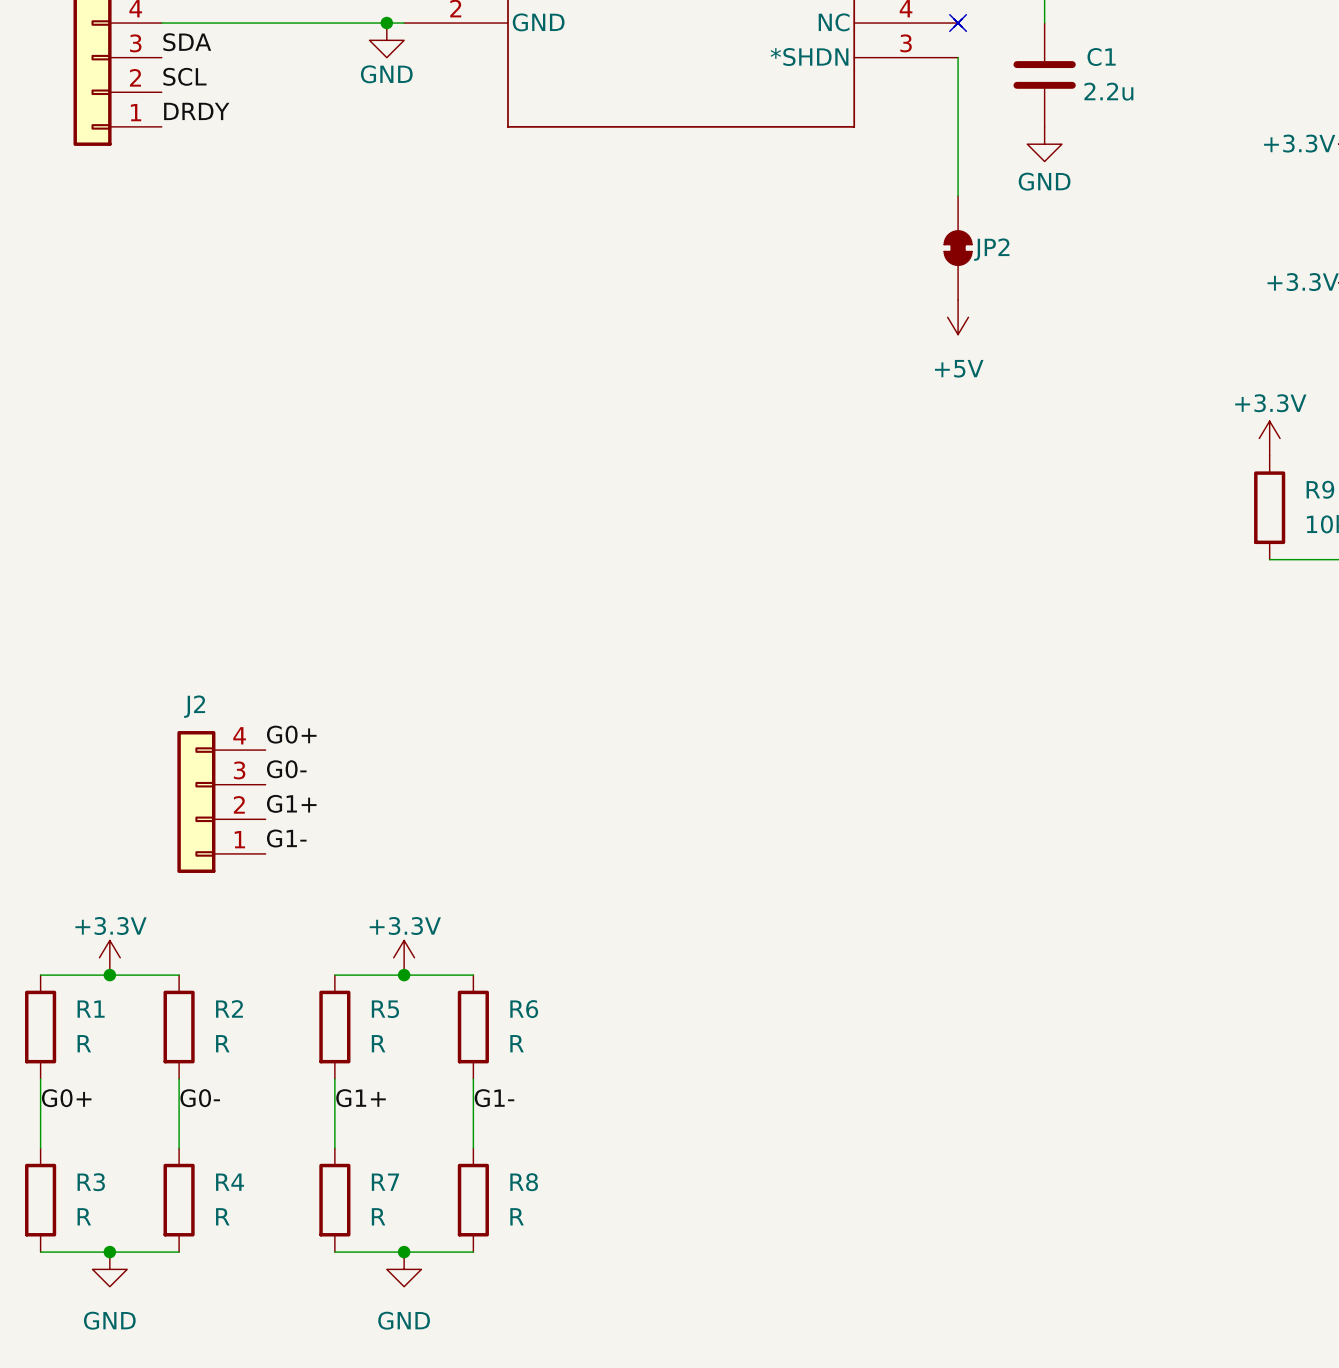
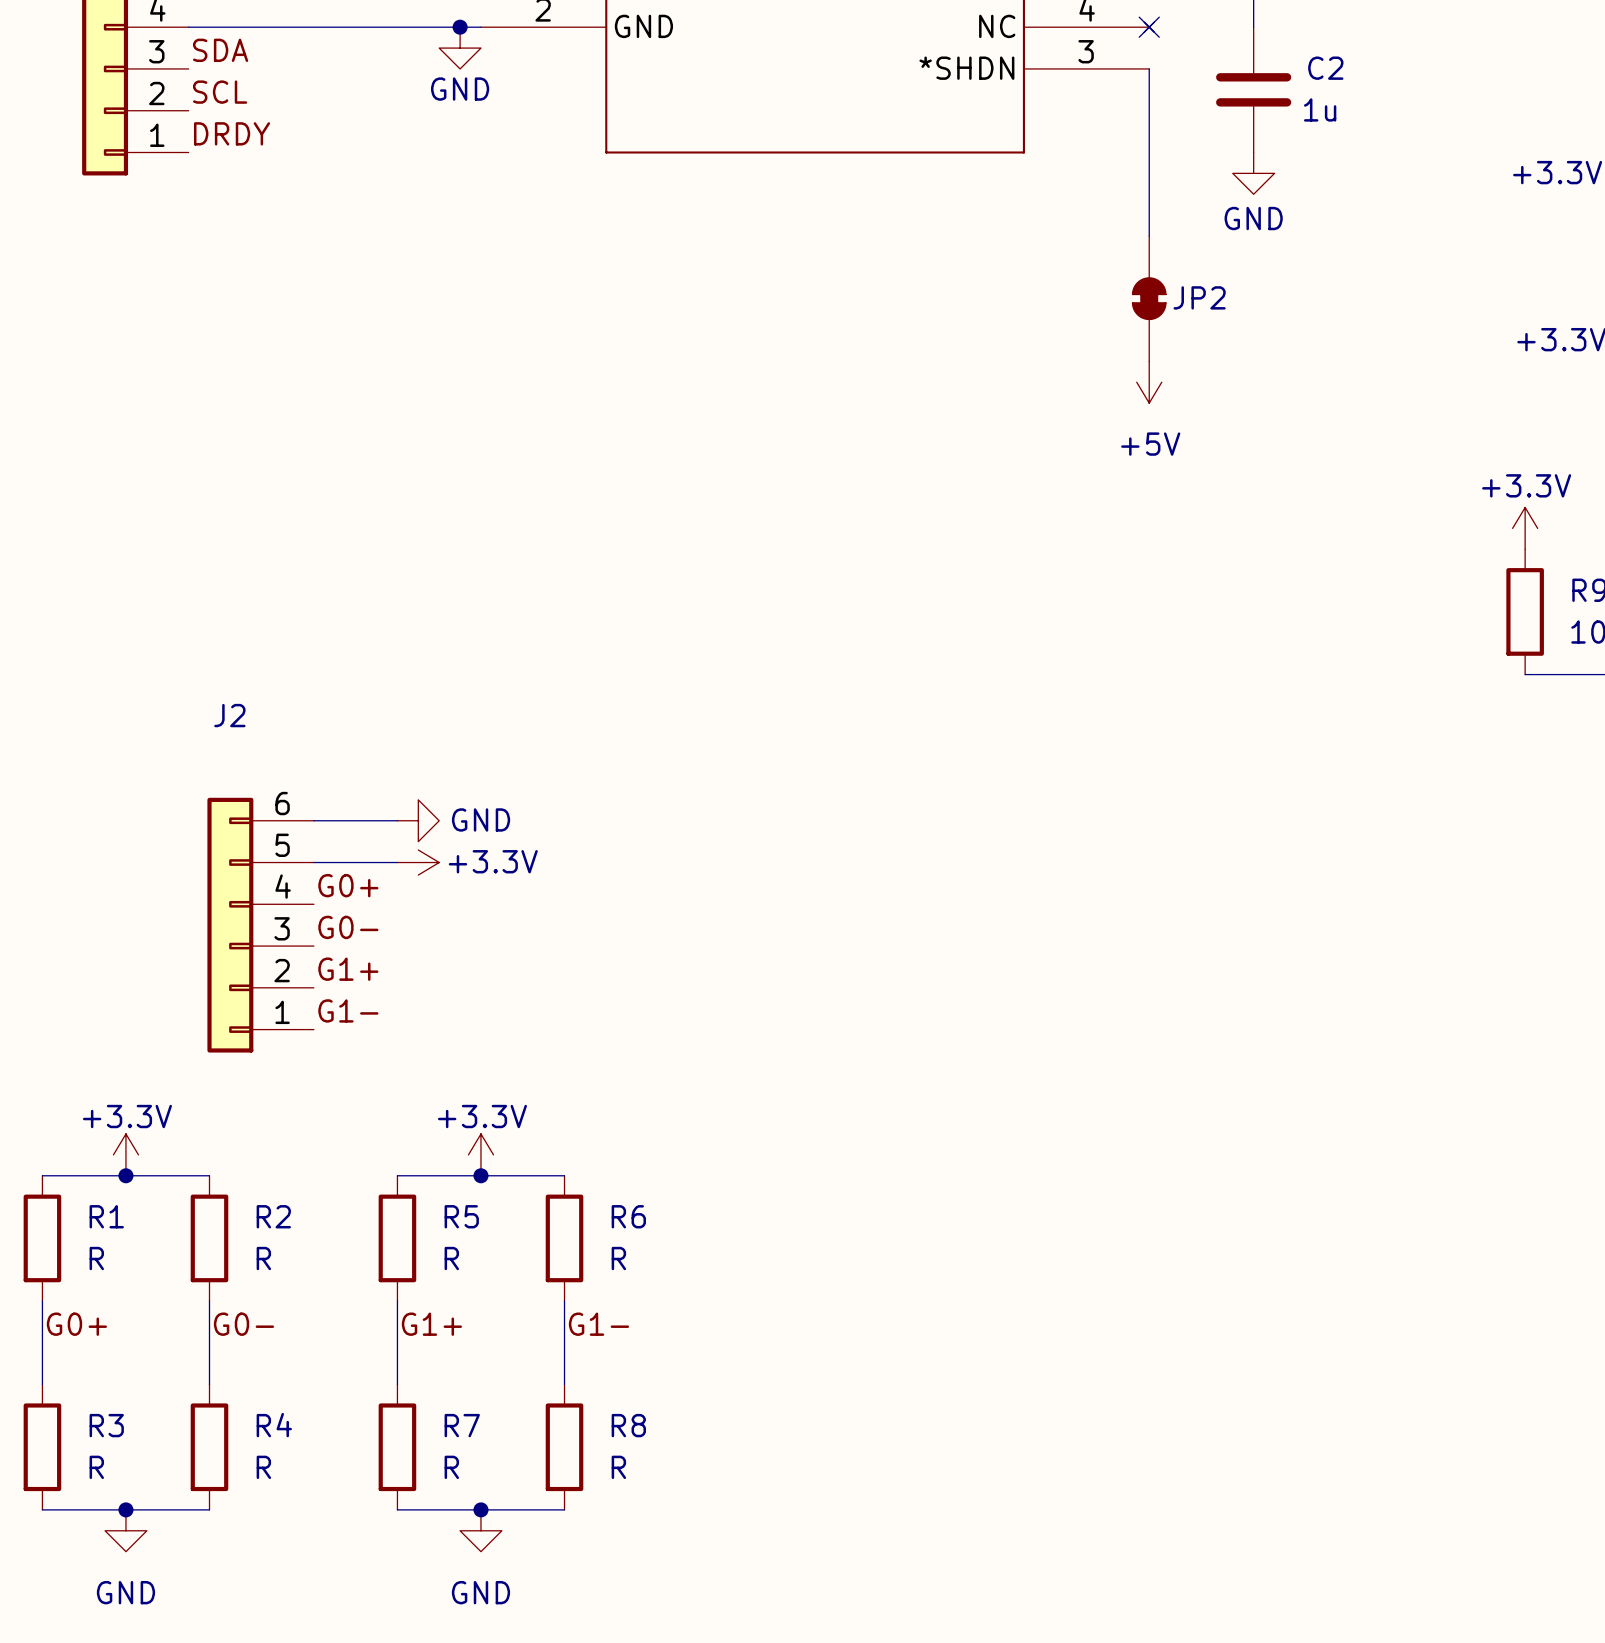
C1 name: C1 (1101, 57) -> C2 (1325, 68)
C1 value: 2.2u (1108, 91) -> 1u (1320, 109)
wire: none -> (313, 820) (397, 820)
power symbol: none -> GND (418, 820)
J2 name position: J2 (194, 706) -> J2 (229, 715)
wire: none -> (313, 862) (397, 862)
power symbol: none -> +3.3V (418, 862)
J2 symbol: [177, 731, 266, 873] -> [207, 797, 314, 1053]

